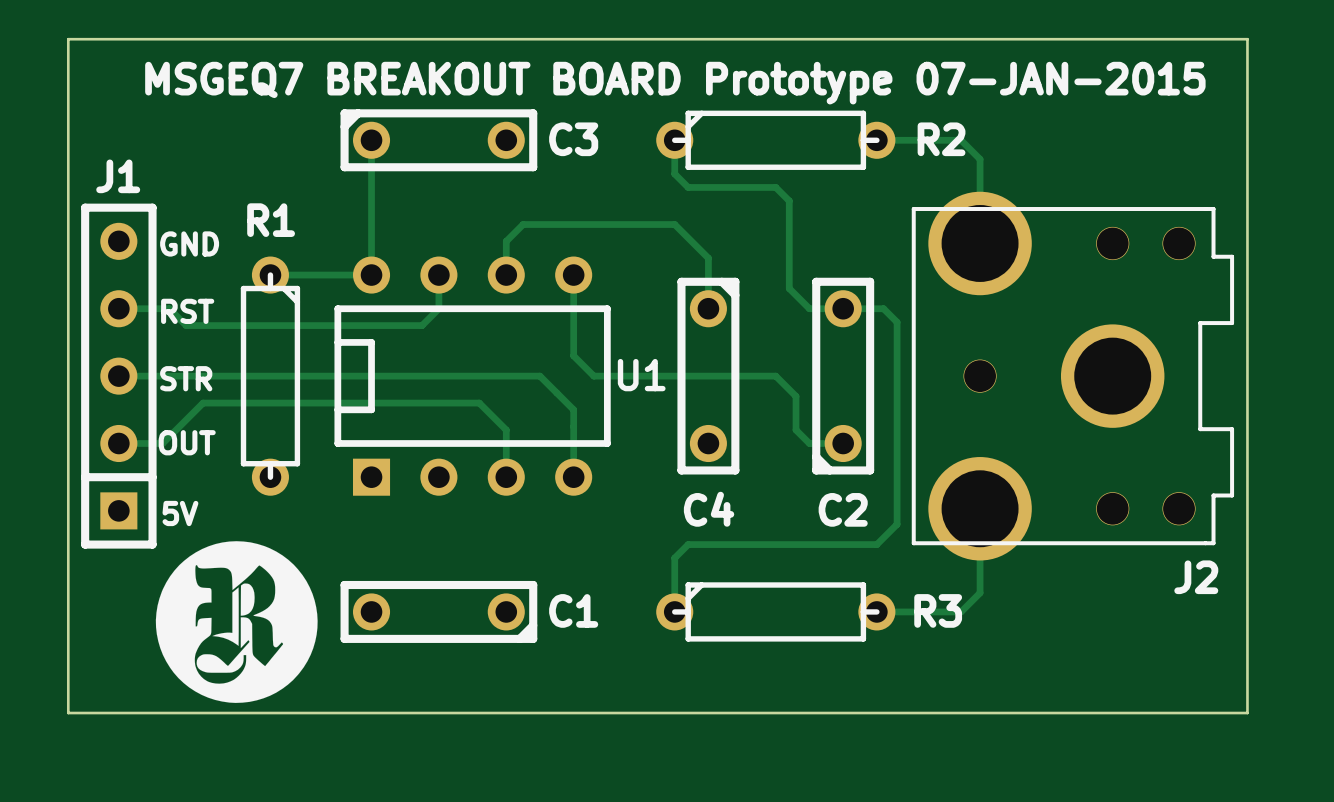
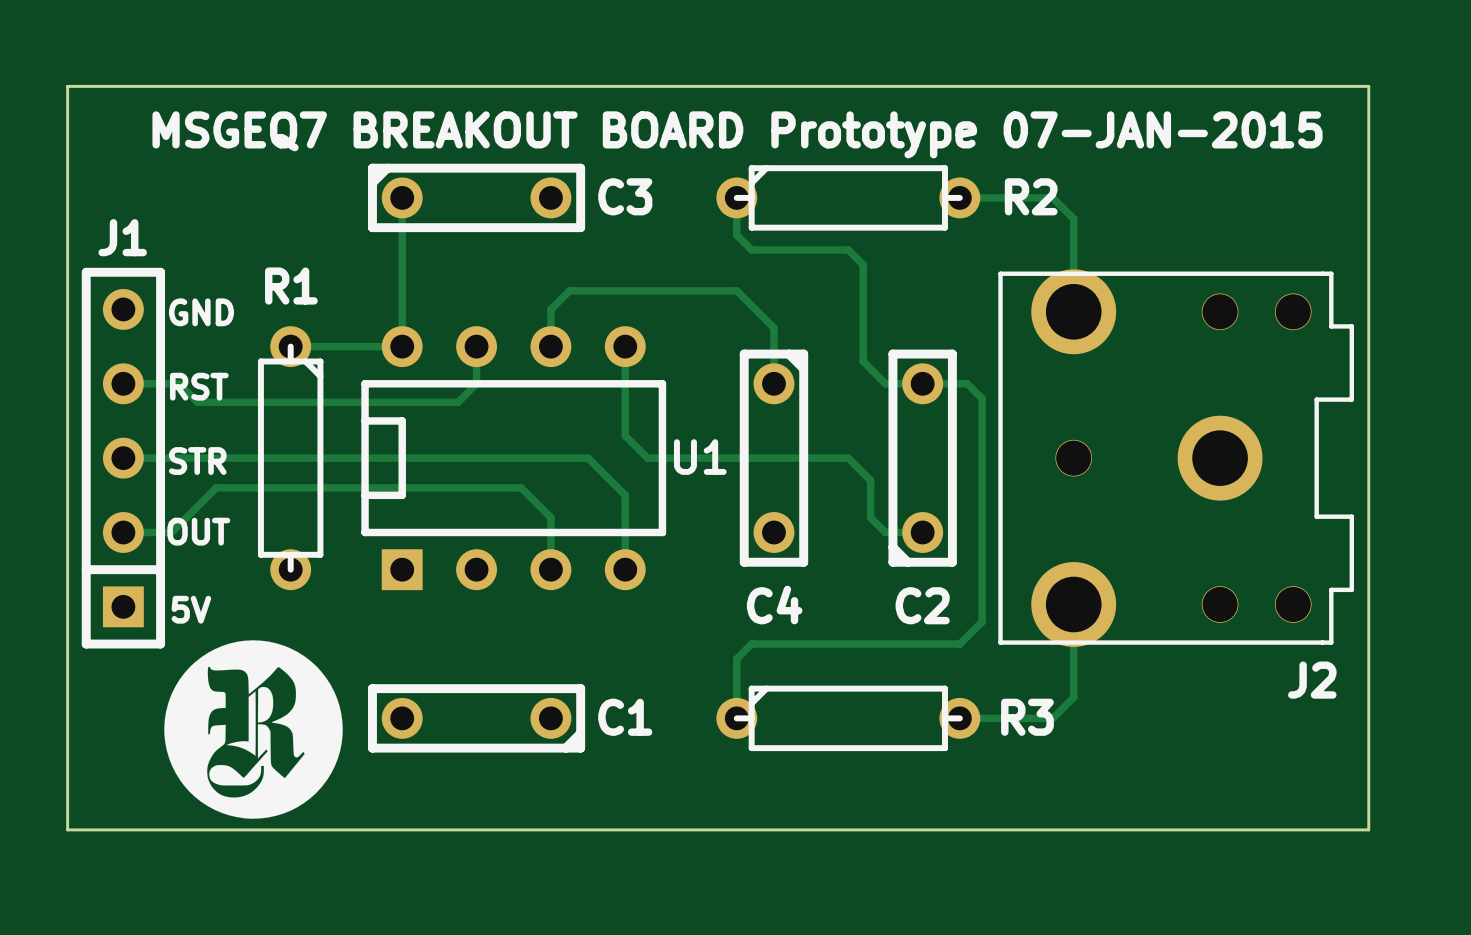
J2 footprint: [911, 191, 1235, 561] -> [998, 269, 1355, 647]

